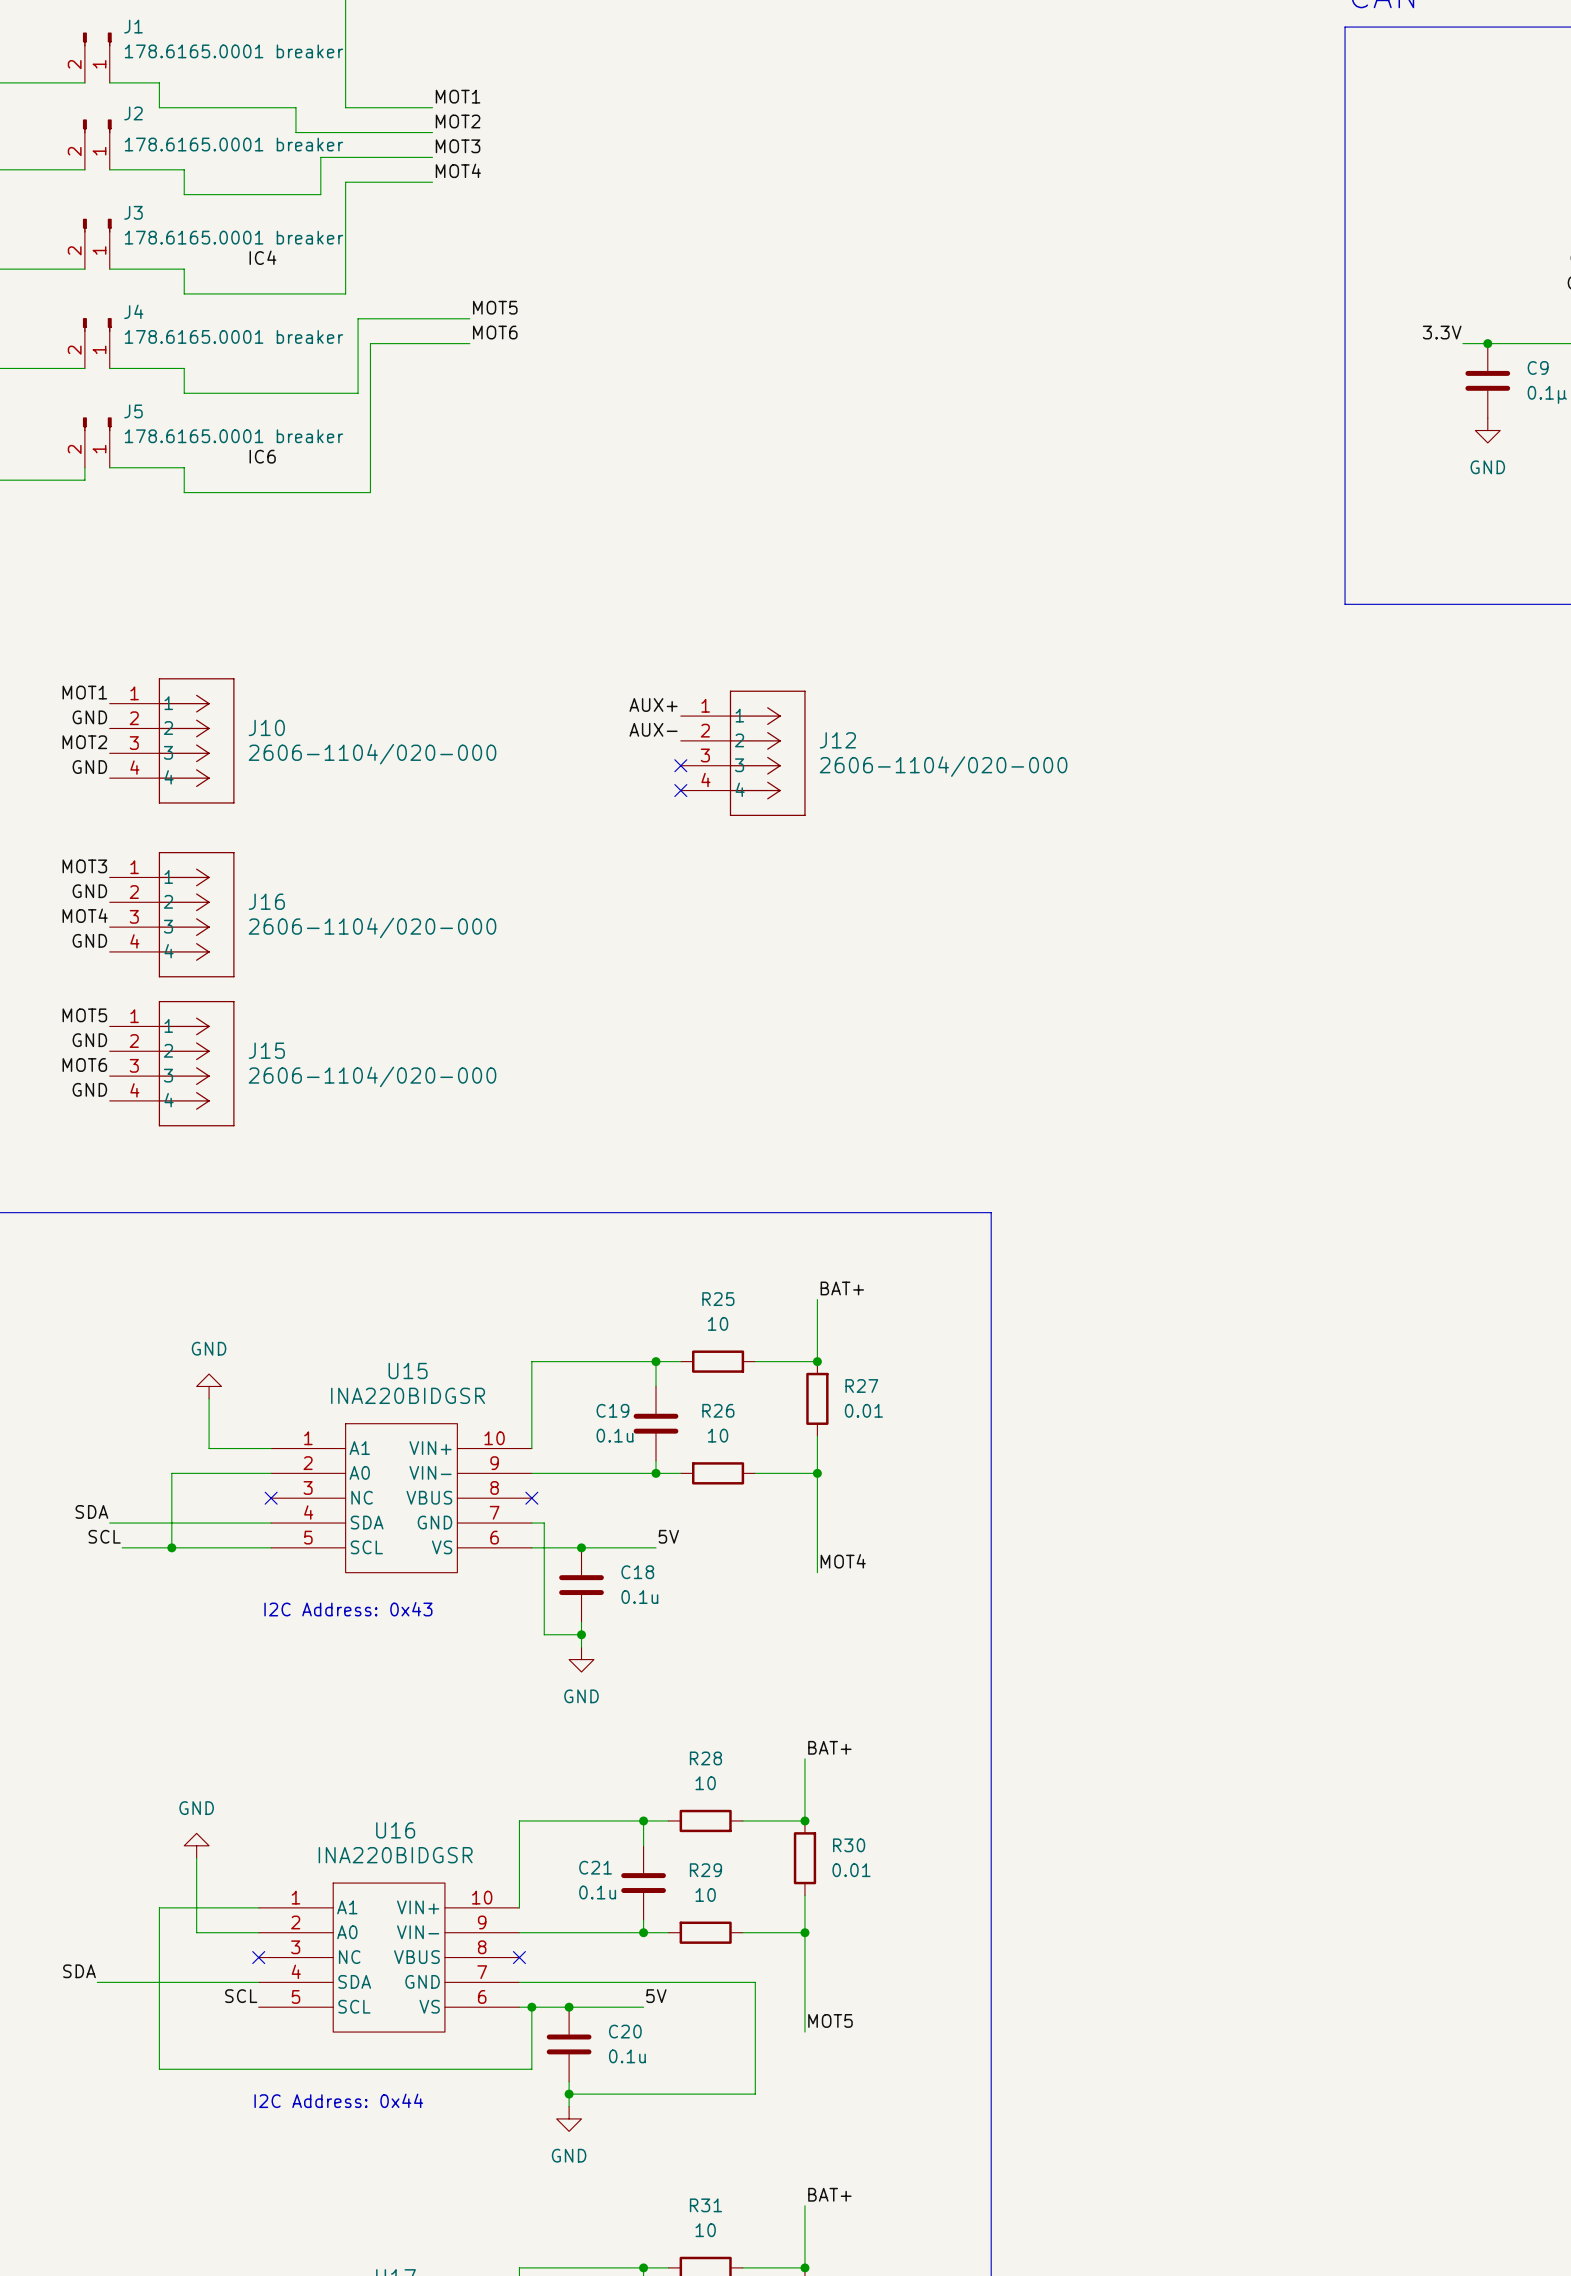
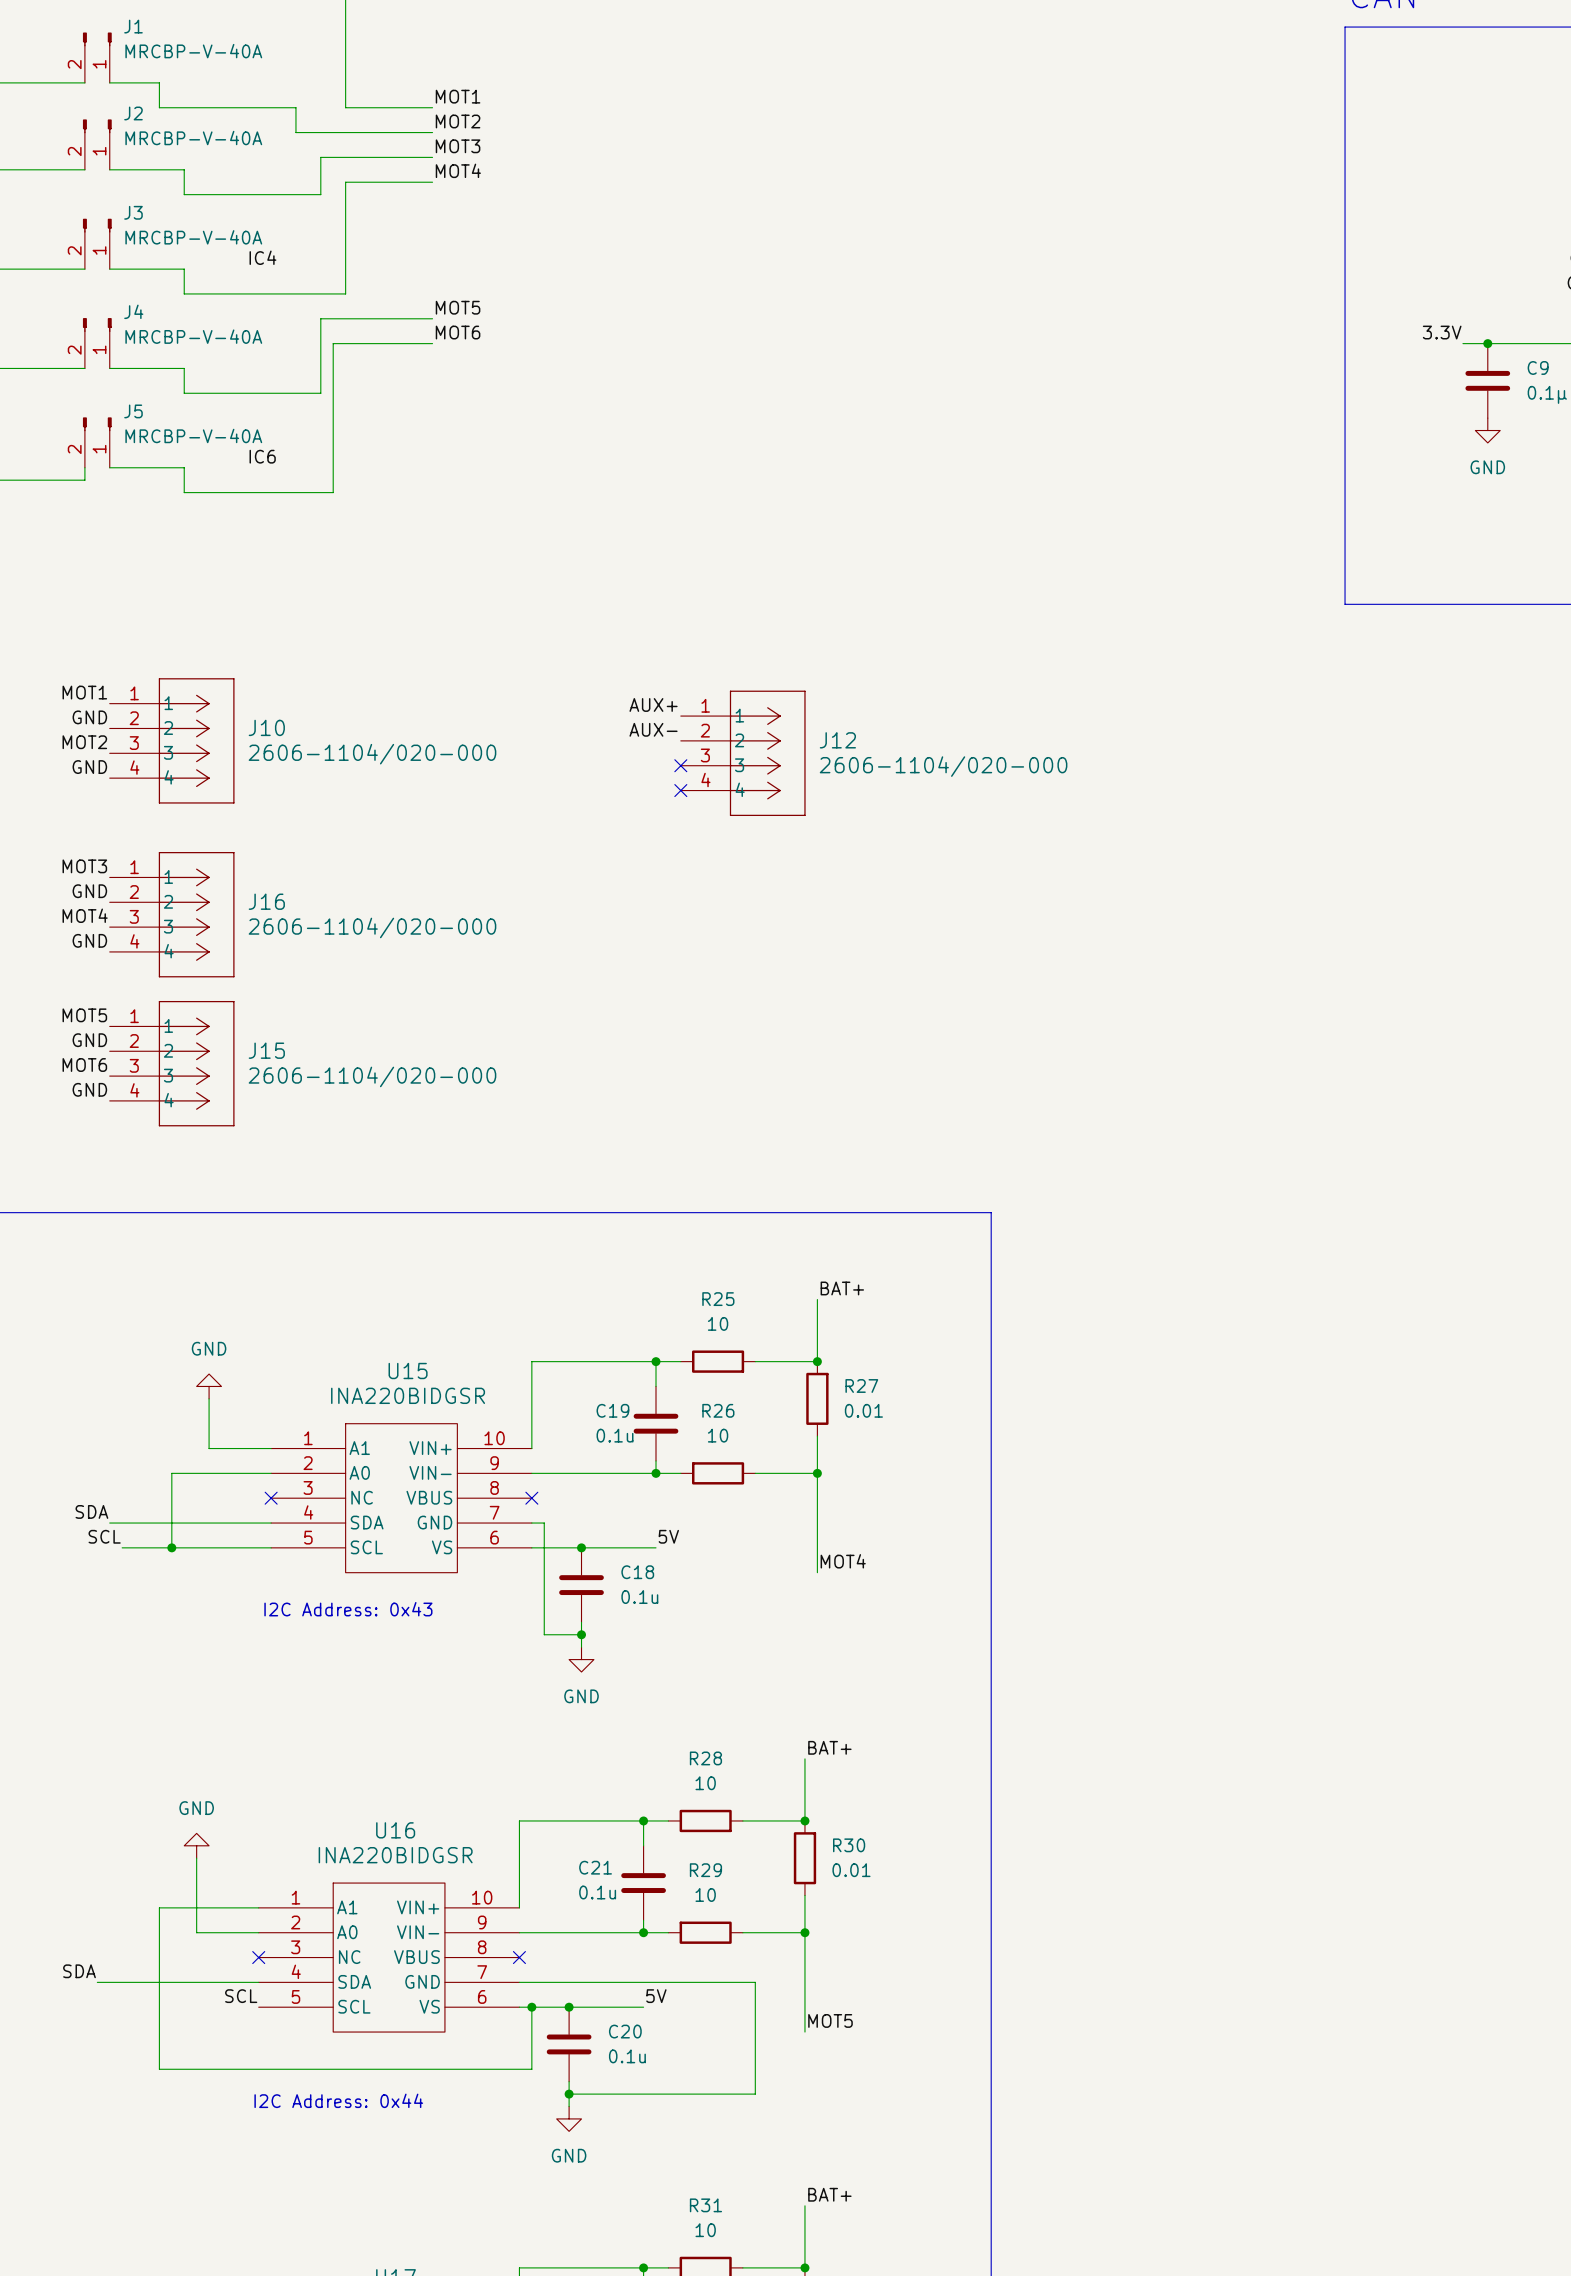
J1 value: 178.6165.0001 breaker (233, 51) -> MRCBP-V-40A (193, 51)
J2 value: 178.6165.0001 breaker (233, 144) -> MRCBP-V-40A (193, 138)
J3 value: 178.6165.0001 breaker (233, 237) -> MRCBP-V-40A (193, 237)
label position: MOT5 (495, 307) -> MOT5 (458, 307)
wire: (358, 318) (358, 393) (320, 393) -> (358, 318) (320, 318) (320, 393)
wire: (432, 318) (469, 318) -> none
label position: MOT6 (495, 332) -> MOT6 (458, 332)
J4 value: 178.6165.0001 breaker (233, 336) -> MRCBP-V-40A (193, 336)
wire: (370, 343) (370, 492) (333, 492) -> (370, 343) (333, 343) (333, 492)
wire: (432, 343) (469, 343) -> none
J5 value: 178.6165.0001 breaker (233, 436) -> MRCBP-V-40A (193, 435)

